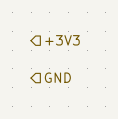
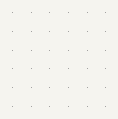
hierarchical label: +3V3 (62, 40) -> none
hierarchical label: GND (57, 77) -> none

